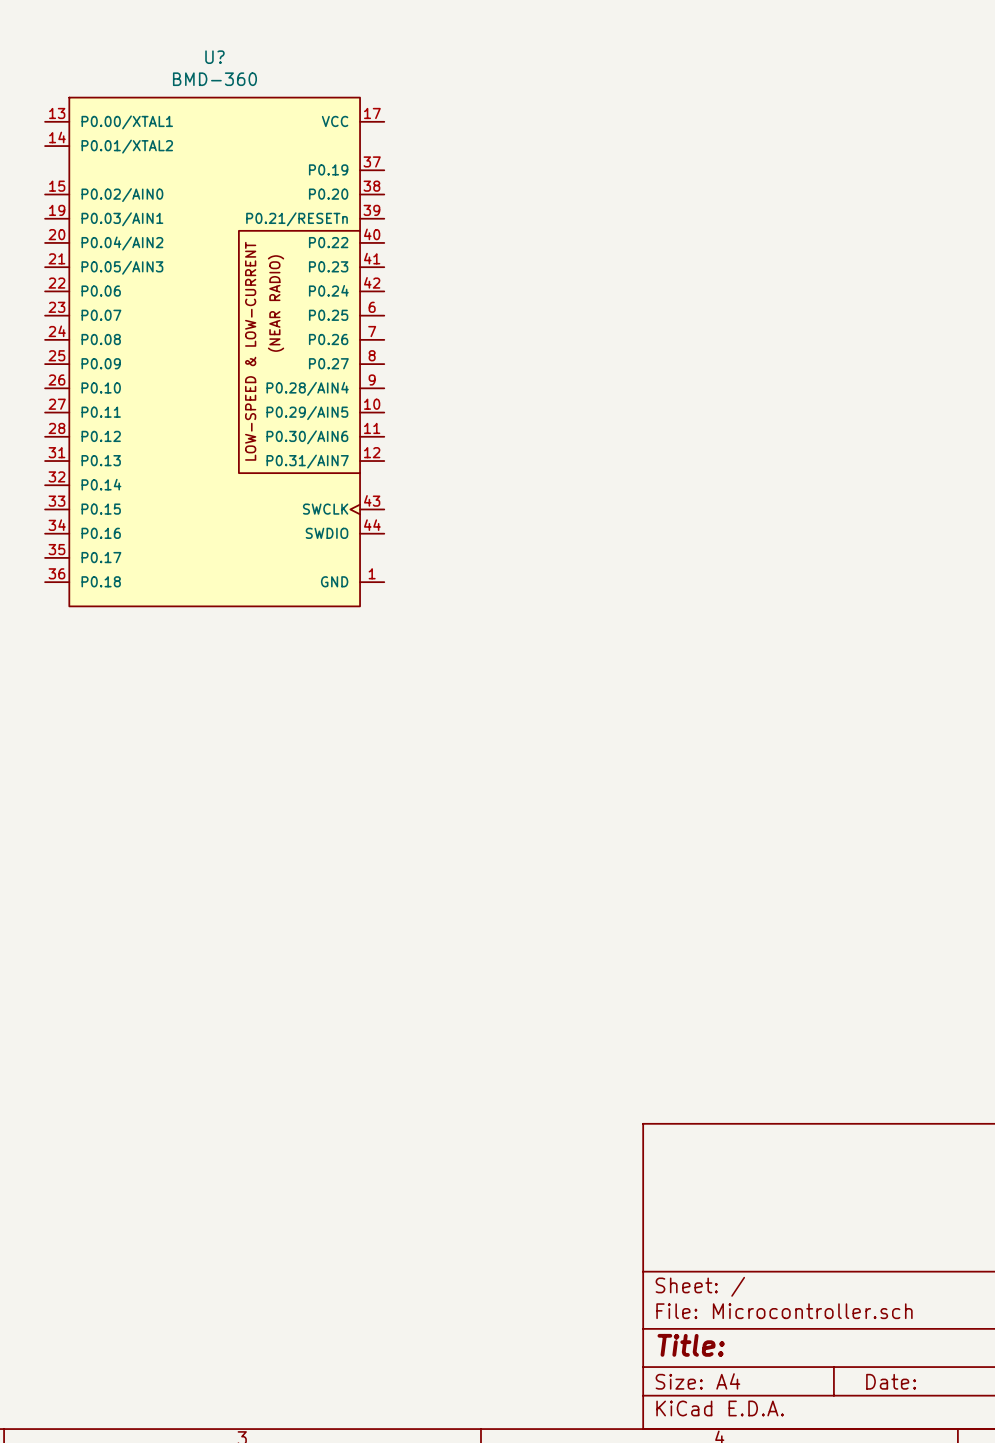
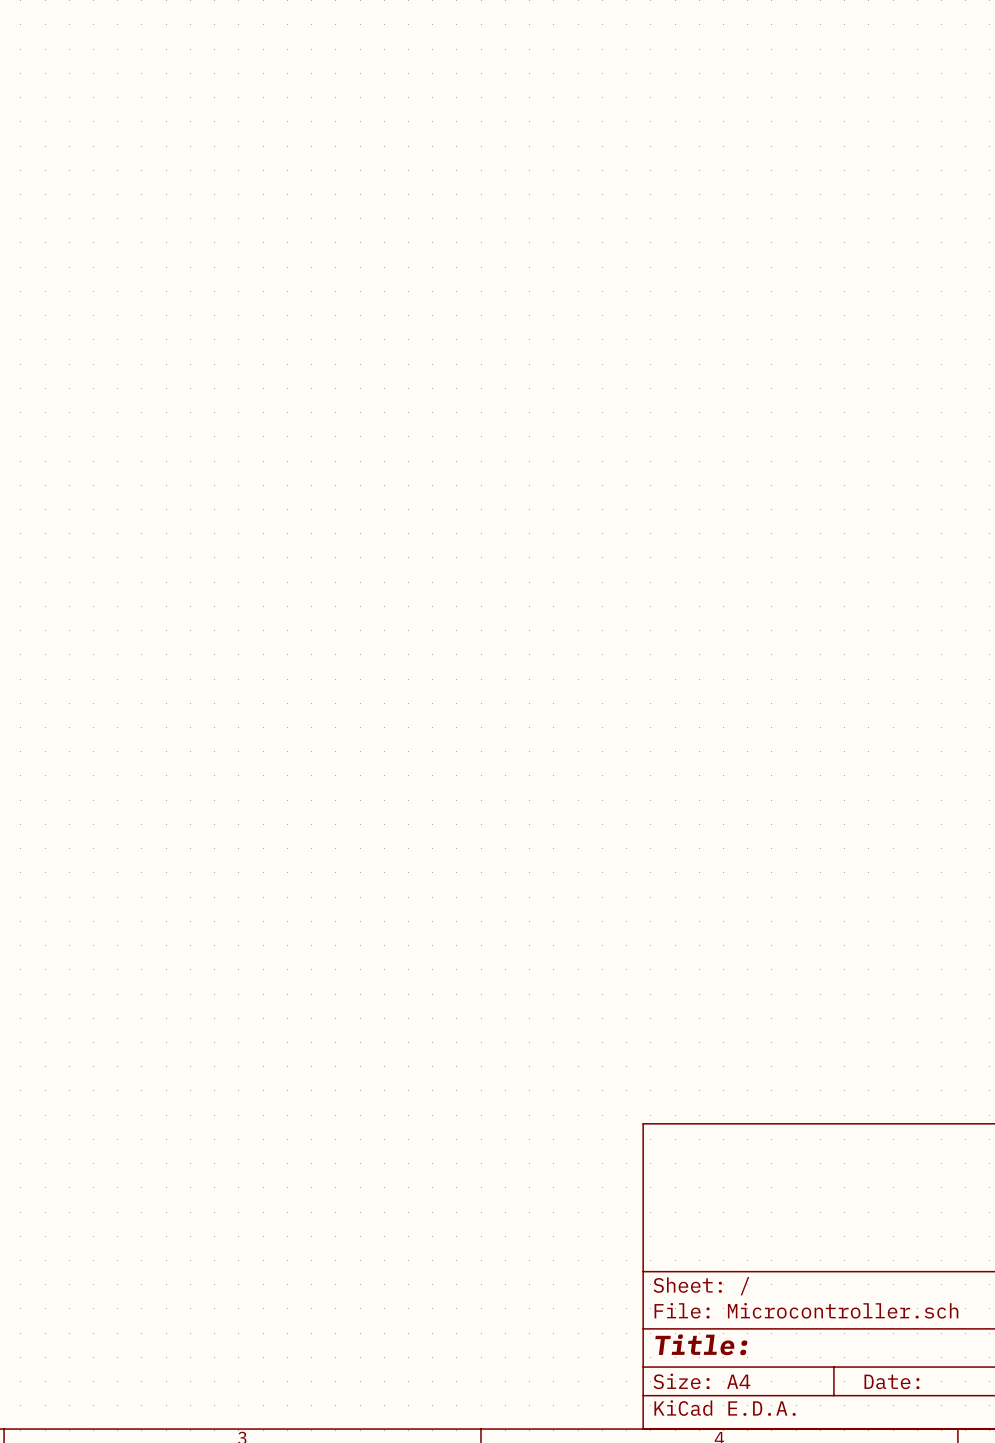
U?: BMD-360 (214, 351) -> none

